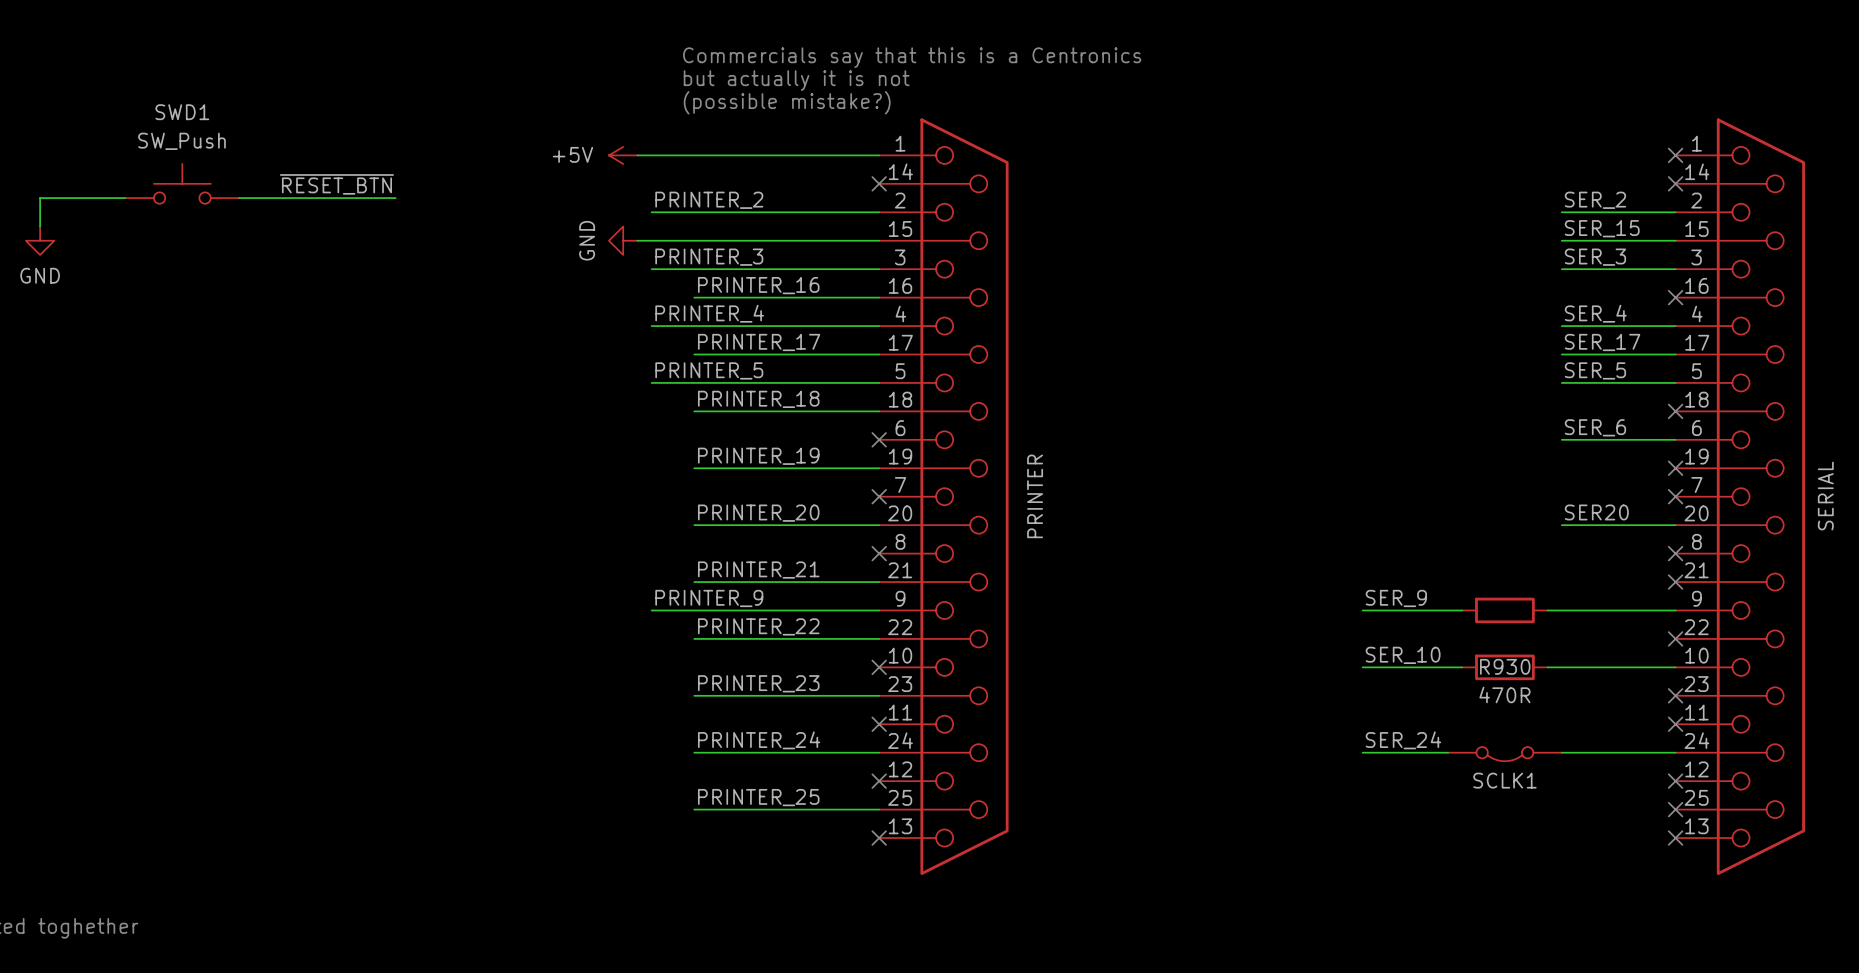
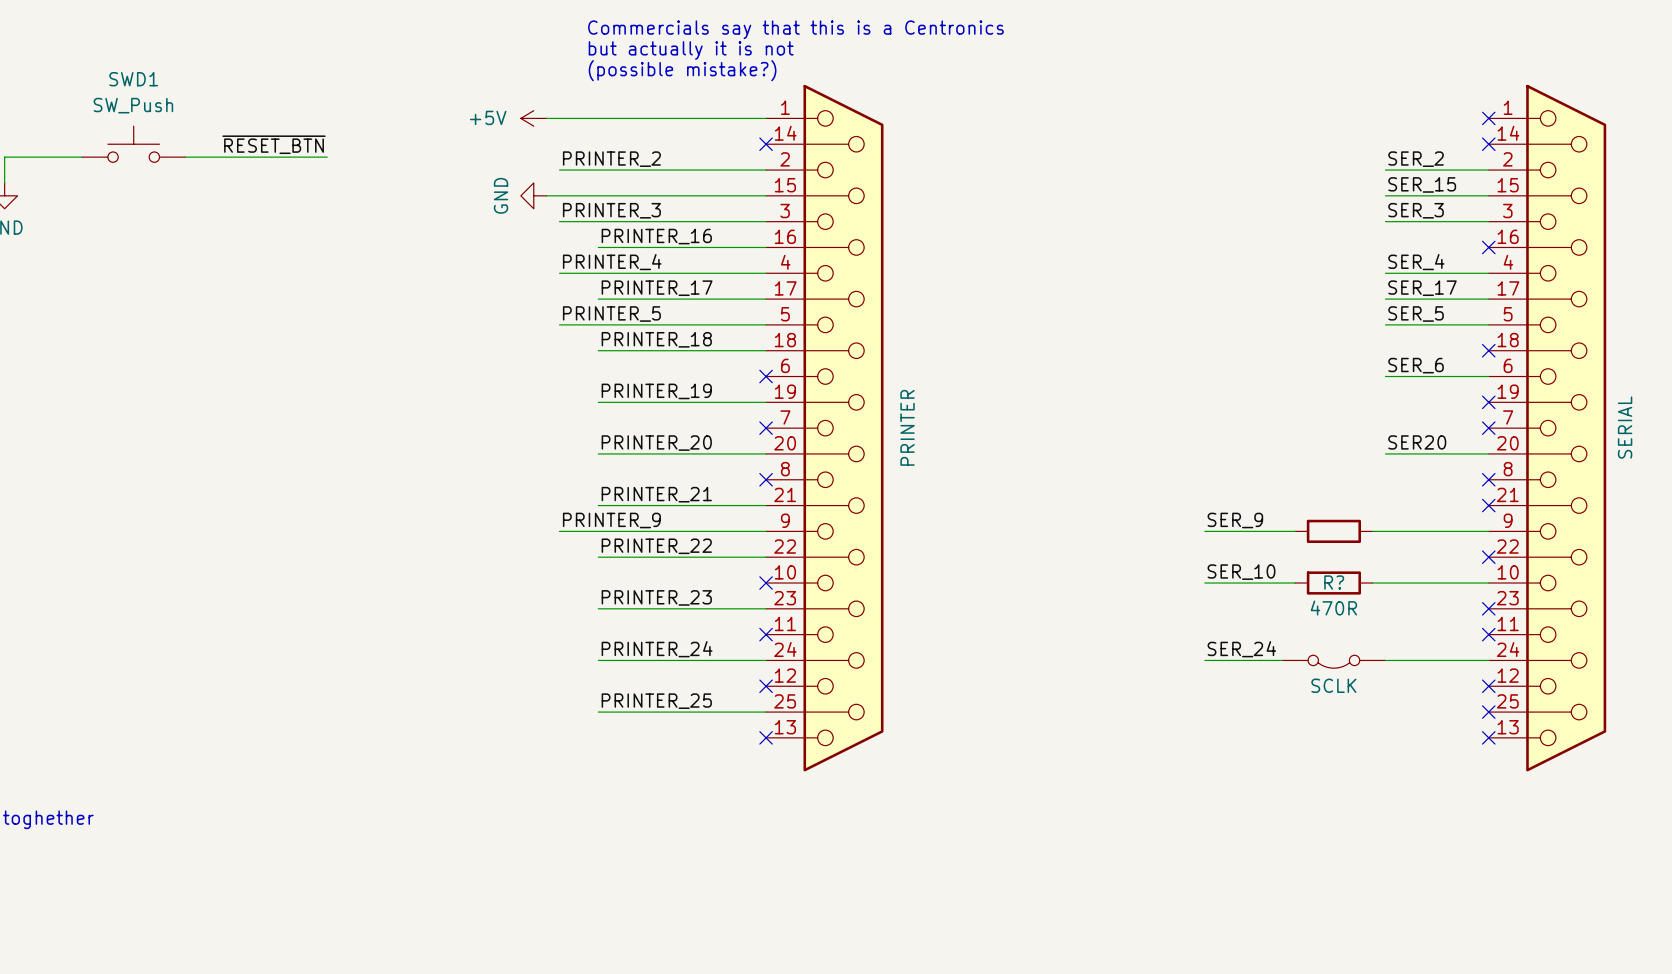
R930 name: R930 (1505, 666) -> R? (1334, 582)
SCLK1 name: SCLK1 (1504, 780) -> SCLK (1333, 685)

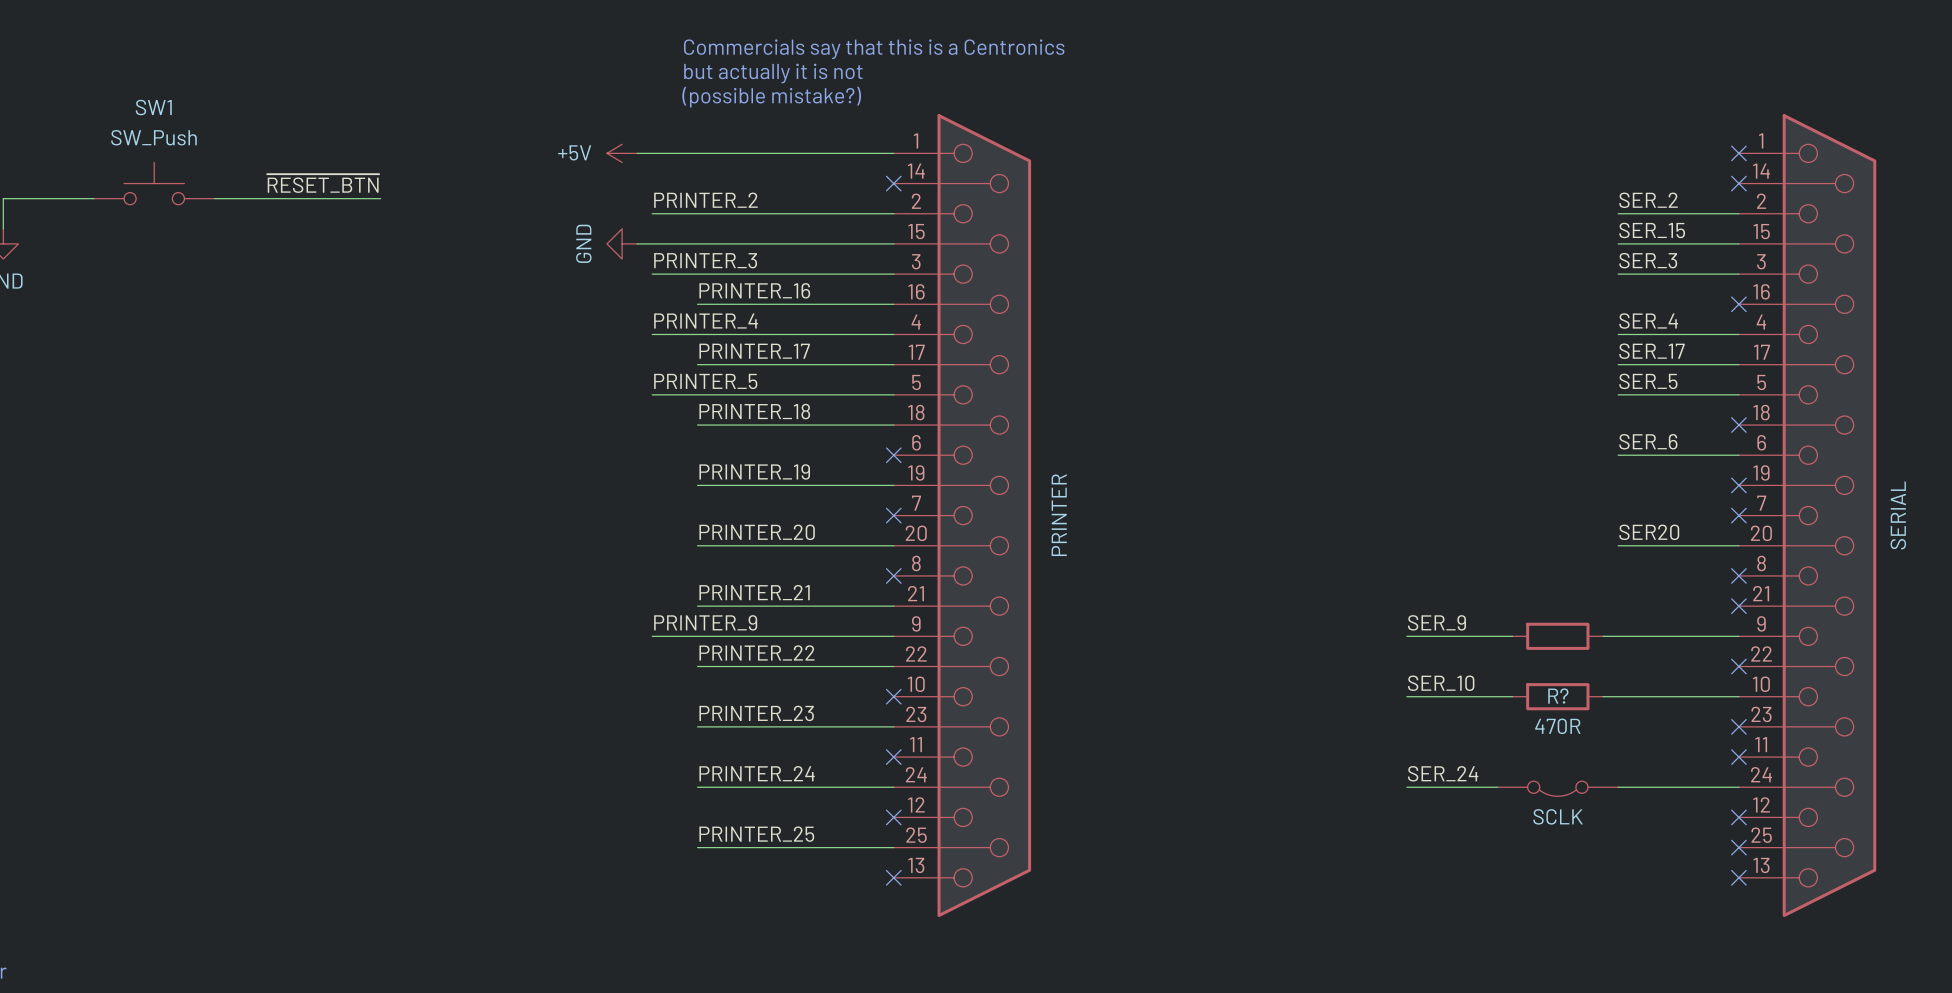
SWD1 name: SWD1 (133, 79) -> SW1 (153, 107)

